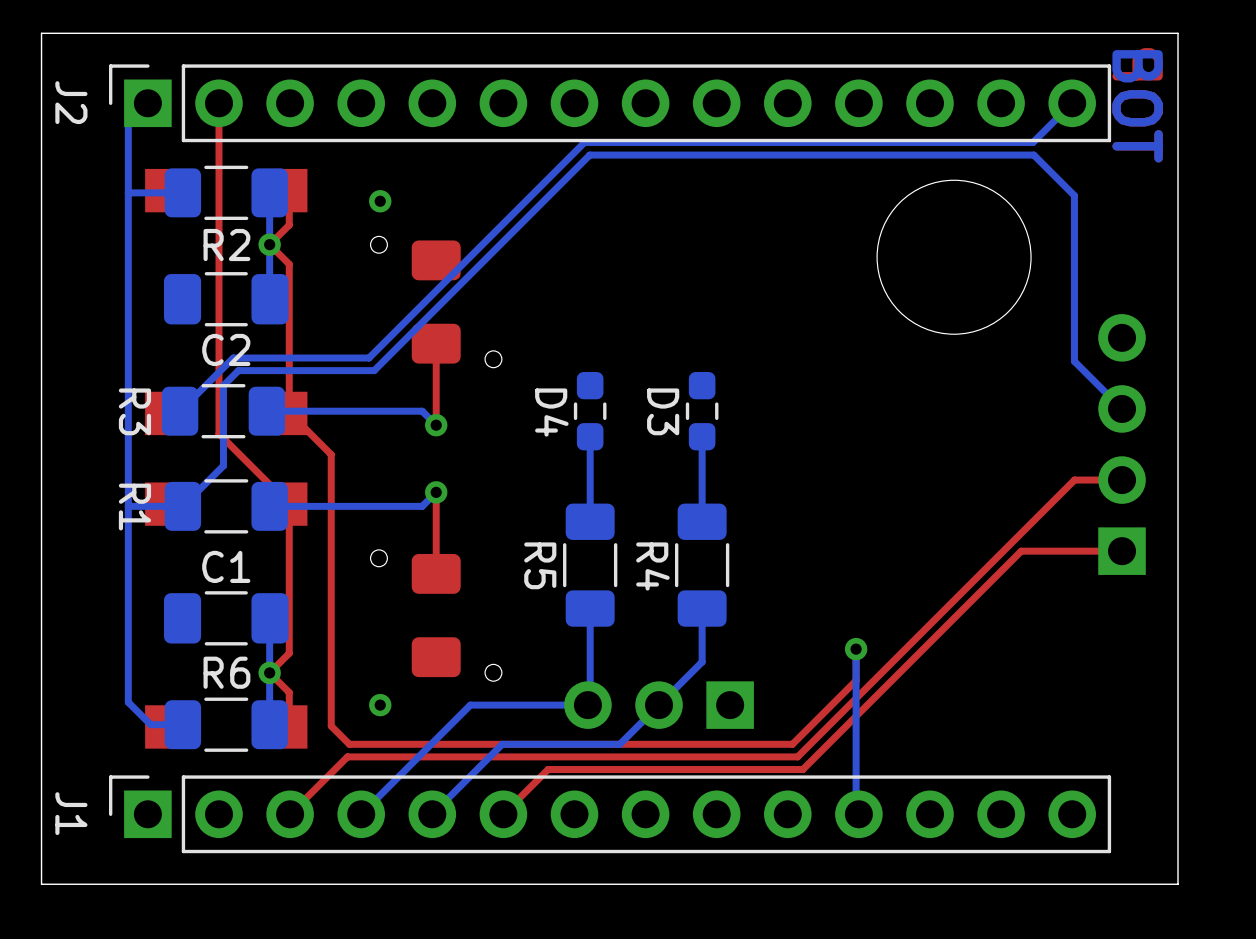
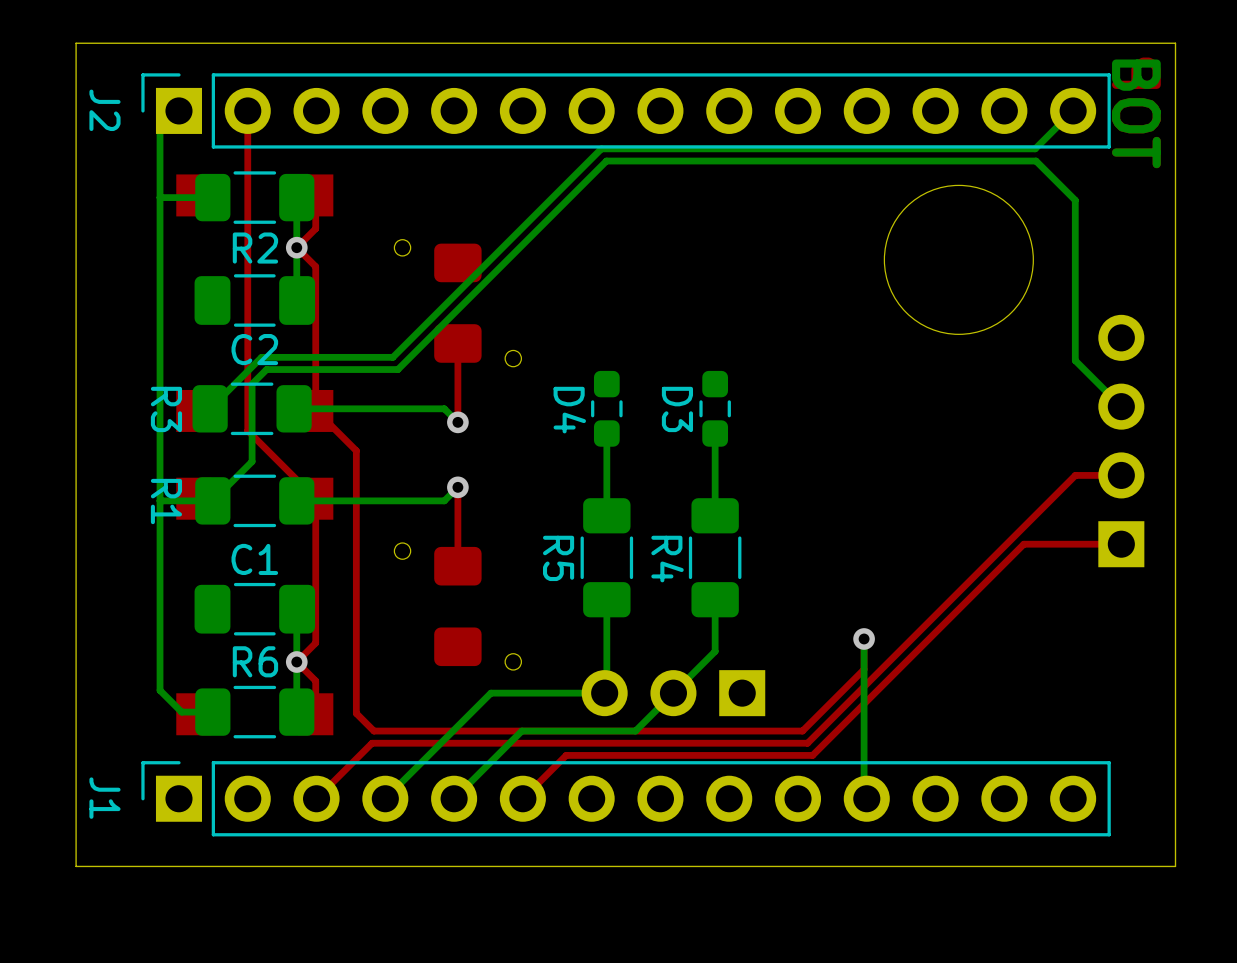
via: (380, 201) -> none
via: (380, 705) -> none

